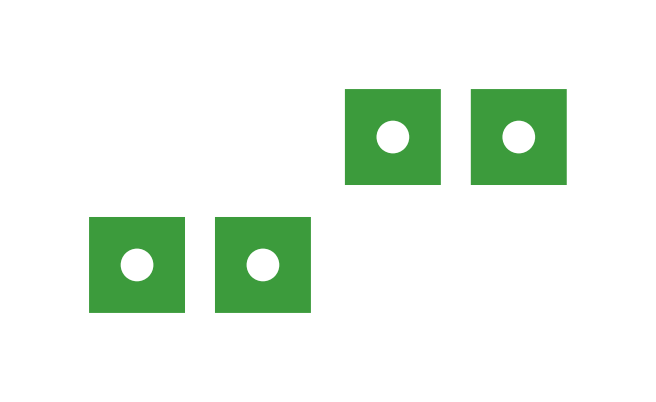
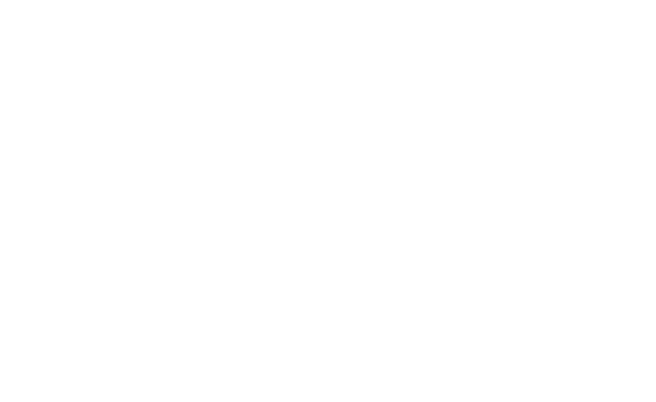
part: (455, 137) -> none
part: (199, 264) -> none

